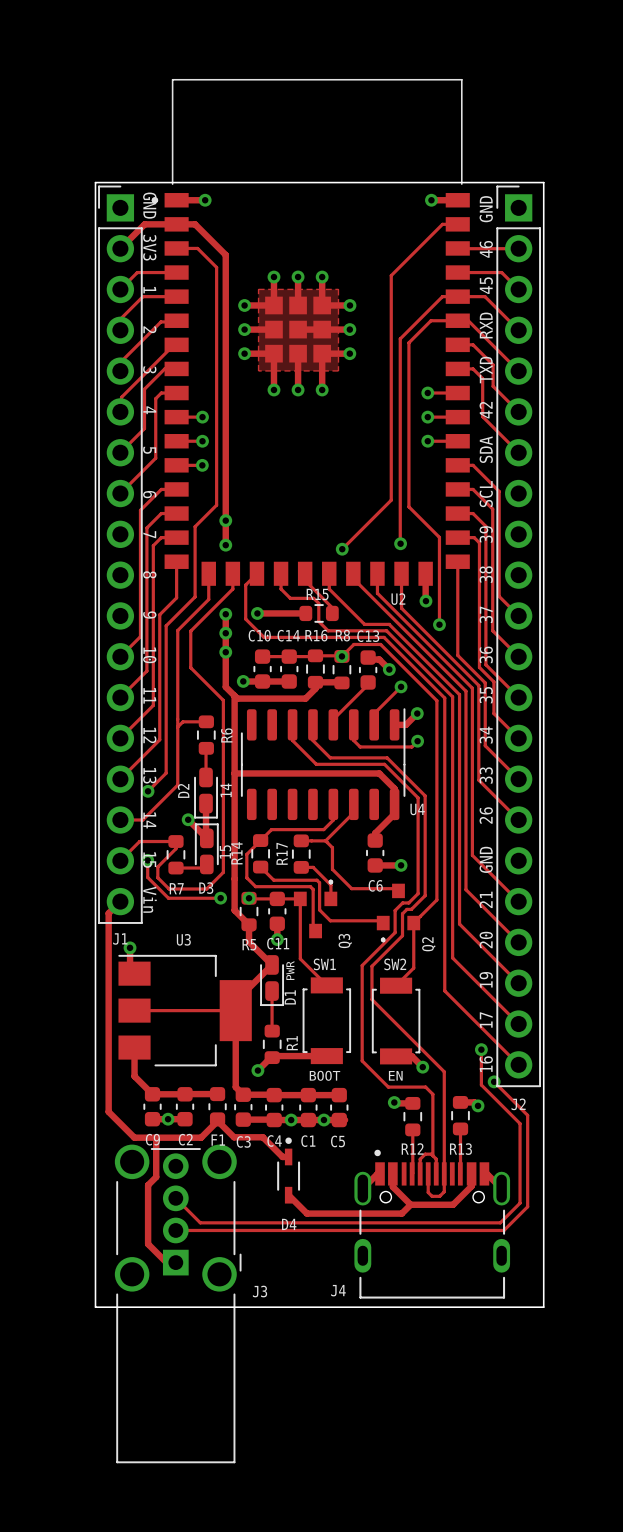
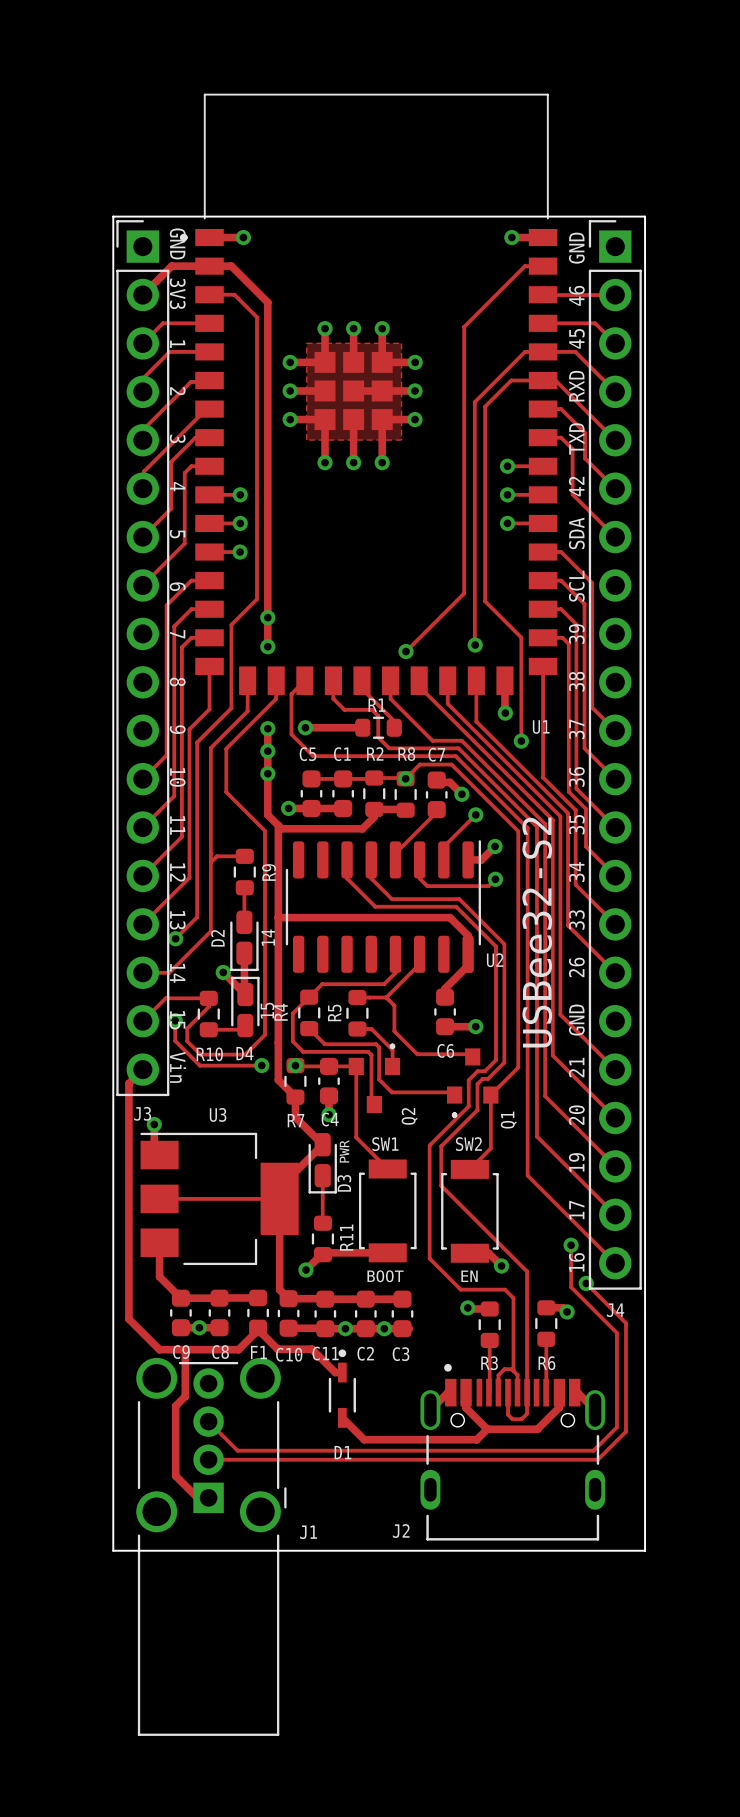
R15 name: R15 (317, 594) -> R1 (376, 705)
U2 name: U2 (398, 599) -> U1 (541, 727)
C10 name: C10 (259, 635) -> C5 (307, 754)
C14 name: C14 (288, 635) -> C1 (342, 754)
R16 name: R16 (316, 635) -> R2 (375, 753)
C13 name: C13 (368, 636) -> C7 (436, 754)
R6 name: R6 (226, 735) -> R9 (269, 872)
text: none -> USBee32-S2 (537, 932)
U4 name: U4 (417, 809) -> U2 (495, 960)
R14 name: R14 (236, 853) -> R4 (281, 1012)
R17 name: R17 (282, 853) -> R5 (334, 1012)
R7 name: R7 (176, 888) -> R10 (209, 1054)
D3 name: D3 (206, 888) -> D4 (244, 1053)
J1 name: J1 (120, 938) -> J3 (142, 1113)
Q3 name: Q3 (345, 941) -> Q2 (409, 1116)
C11 name: C11 (278, 943) -> C4 (330, 1119)
R5 name: R5 (249, 944) -> R7 (296, 1120)
Q2 name: Q2 (428, 944) -> Q1 (508, 1120)
D1 name: D1 (290, 997) -> D3 (344, 1183)
R1 name: R1 (292, 1043) -> R11 (346, 1237)
J2 name: J2 (518, 1104) -> J4 (615, 1310)
C2 name: C2 (185, 1139) -> C8 (220, 1352)
C4 name: C4 (274, 1140) -> C11 (325, 1353)
C3 name: C3 (243, 1141) -> C10 (289, 1354)
C1 name: C1 (308, 1141) -> C2 (365, 1353)
C5 name: C5 (338, 1141) -> C3 (401, 1354)
R12 name: R12 (412, 1148) -> R3 (489, 1363)
R13 name: R13 (460, 1149) -> R6 (546, 1363)
D4 name: D4 (289, 1224) -> D1 (342, 1452)
J4 name: J4 (338, 1290) -> J2 (401, 1531)
J3 name: J3 (260, 1291) -> J1 (308, 1532)

